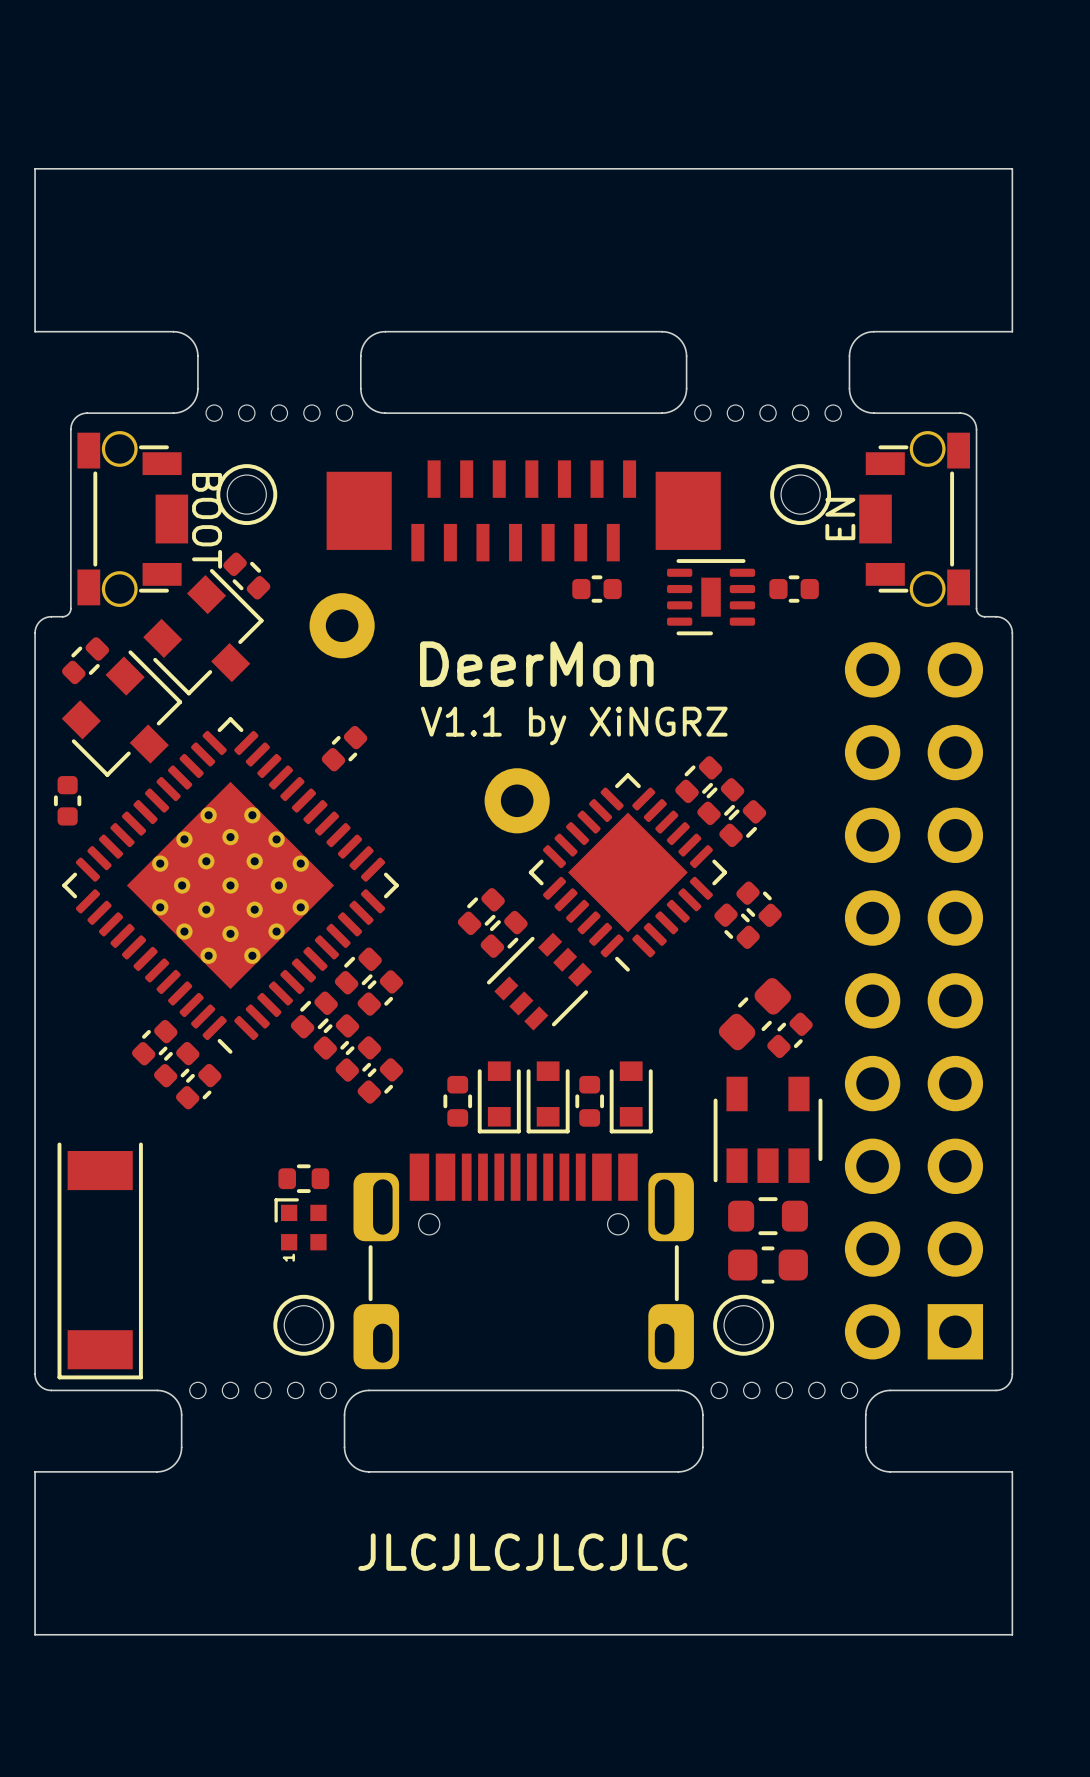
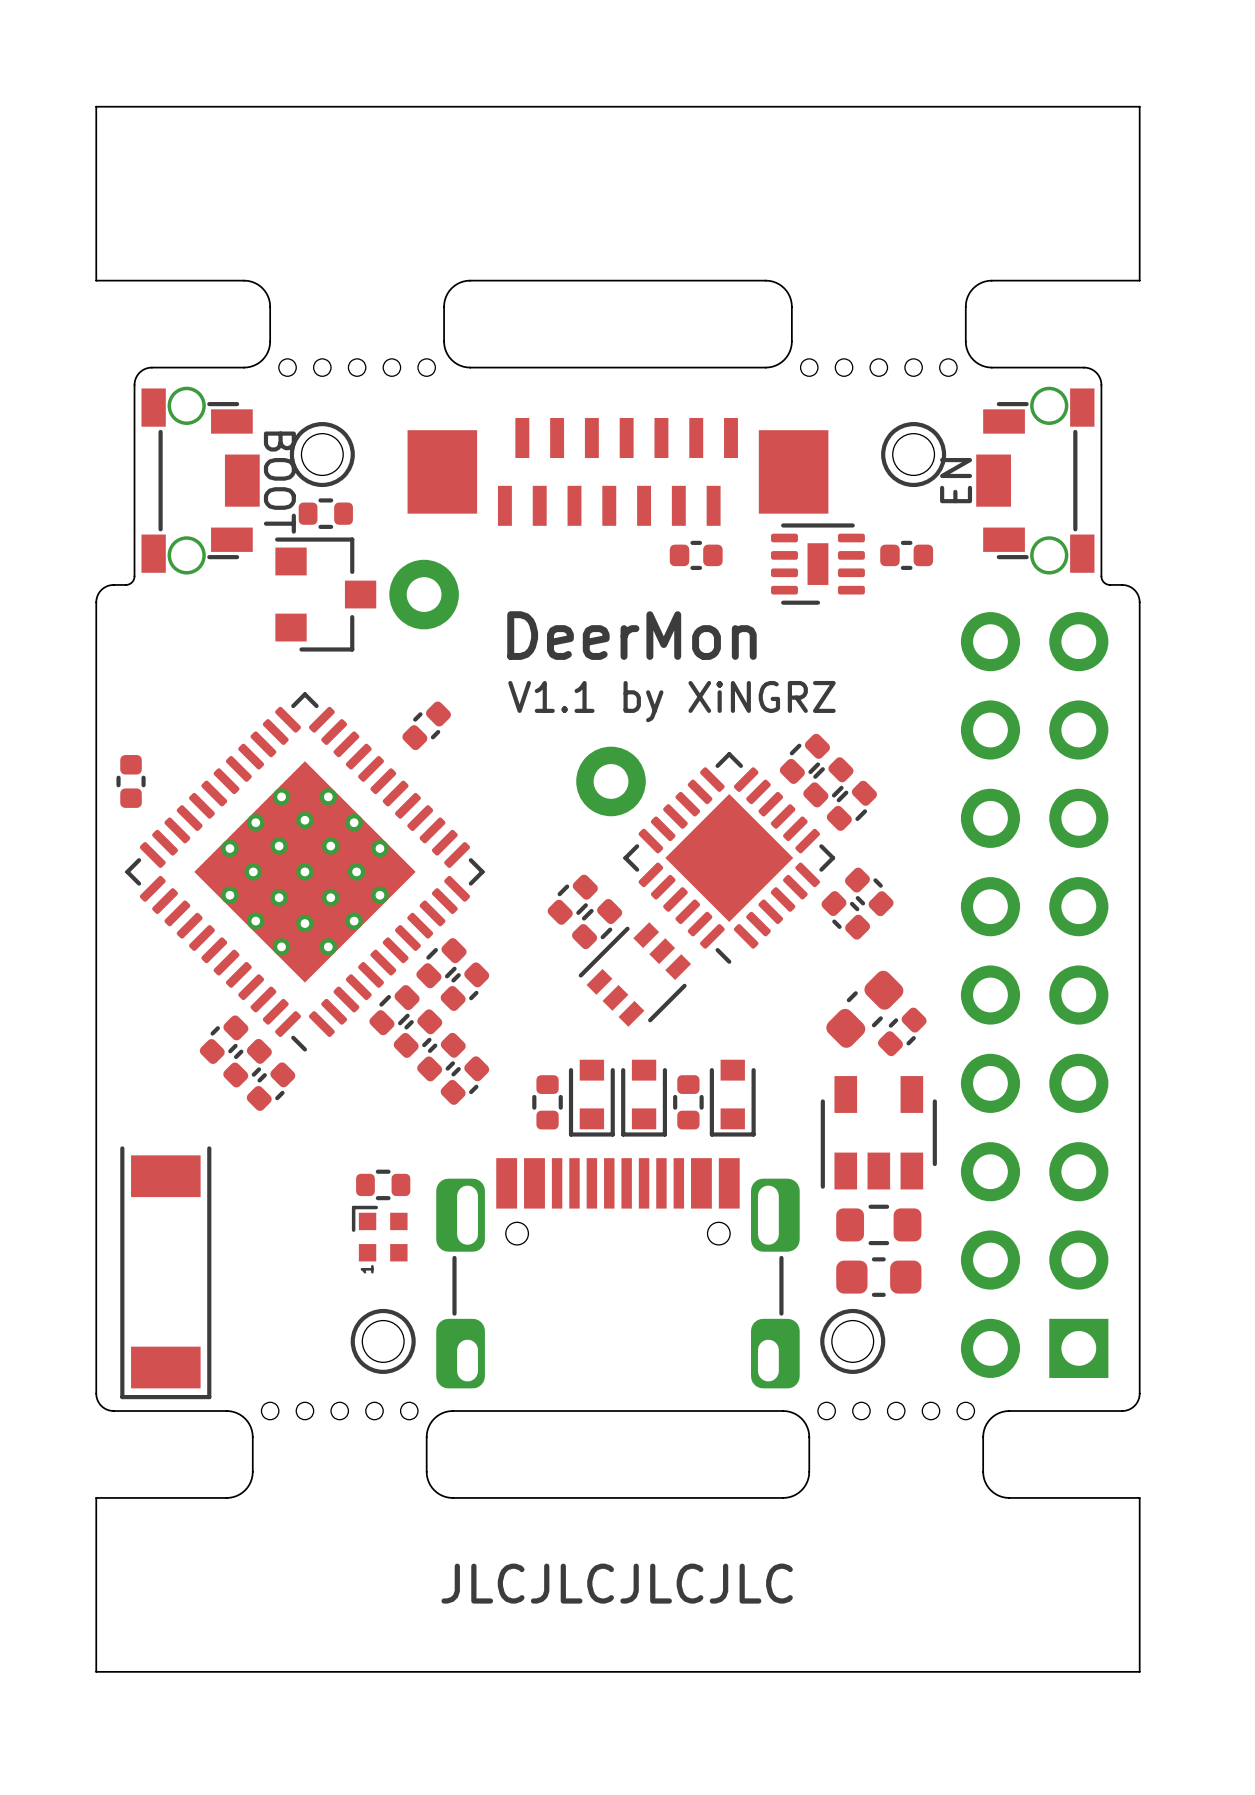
part: none -> (325, 513)
part: (246, 576) -> none
part: none -> (325, 594)
part: (203, 632) -> none
part: (85, 660) -> none
part: (121, 713) -> none

